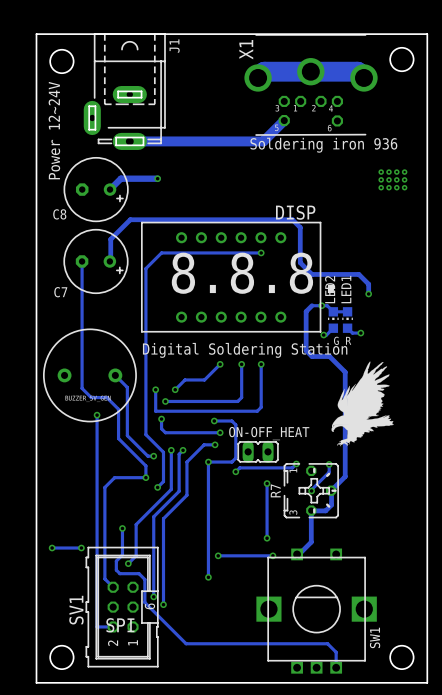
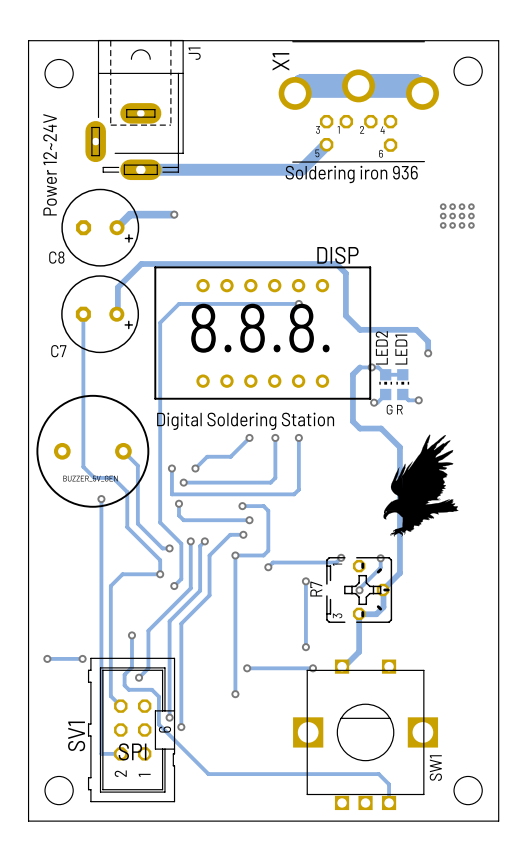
ON-OFF_HEAT: (258, 451) -> none

